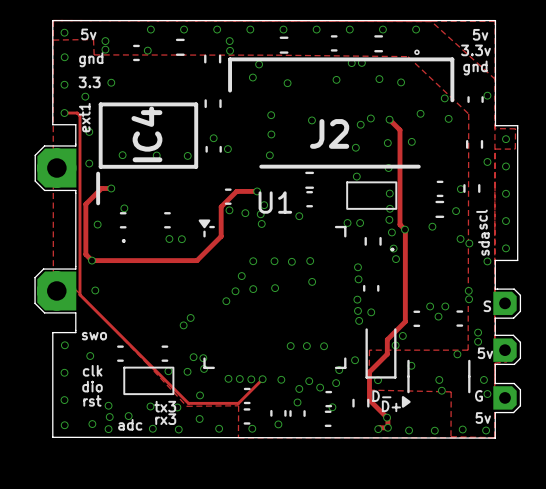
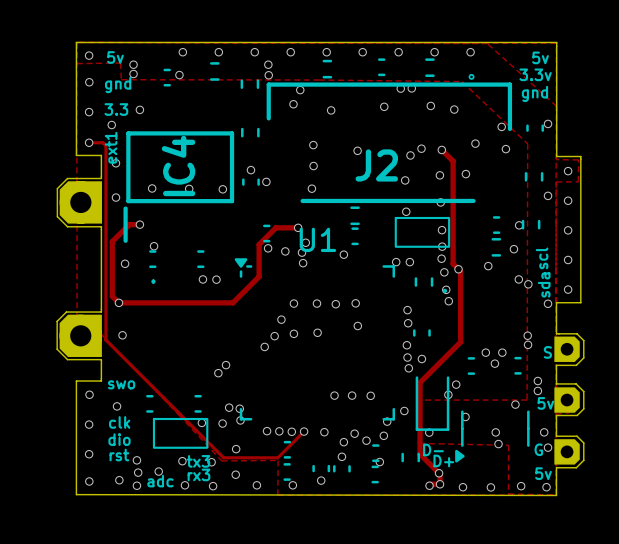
track: (405, 230) (405, 321) (387, 339) (387, 354) (369, 371) -> (458, 269) (460, 271) (460, 342) (420, 382) (420, 423)

